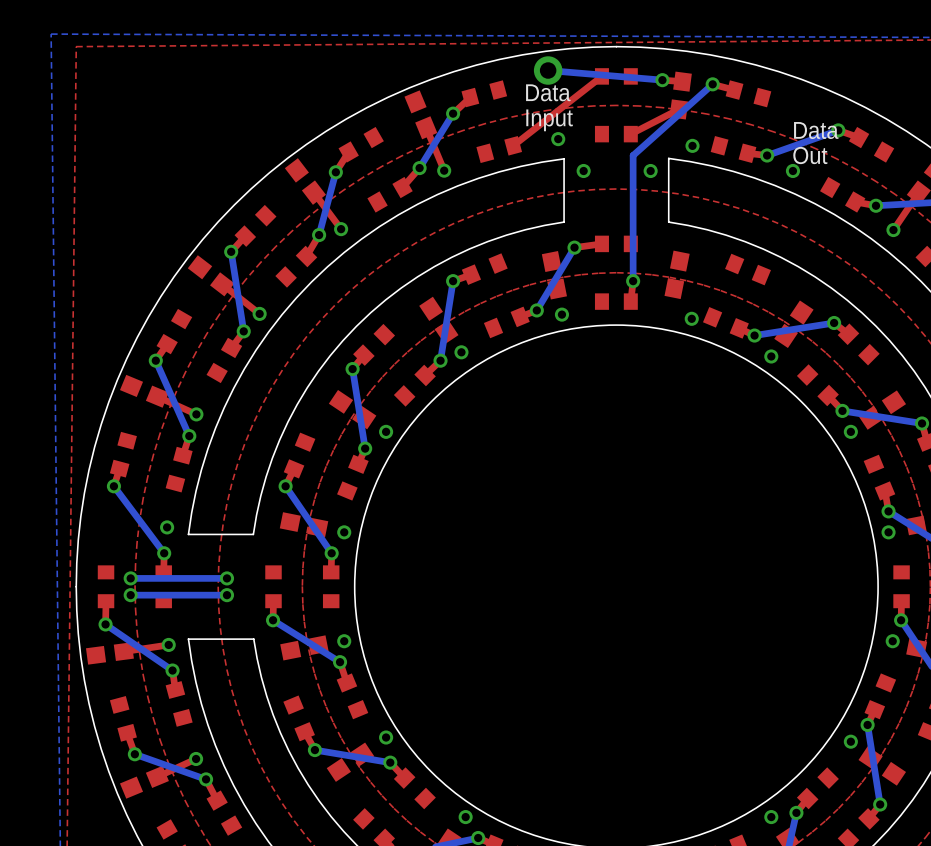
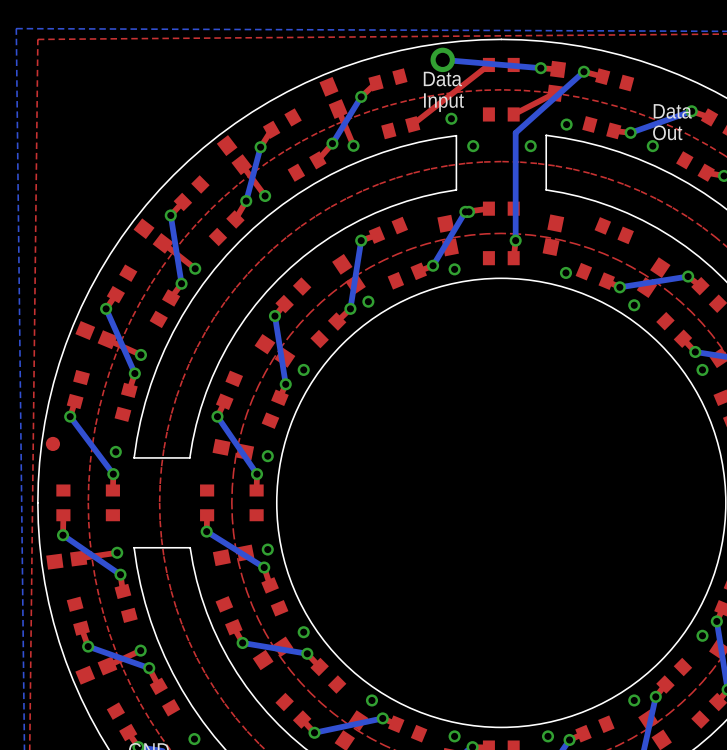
via: none -> (468, 211)
part: none -> (52, 443)
via: (130, 578) -> none
bottom track: (226, 578) (130, 578) -> none
via: (226, 578) -> none
via: (130, 595) -> none
bottom track: (226, 595) (130, 595) -> none
via: (226, 595) -> none

